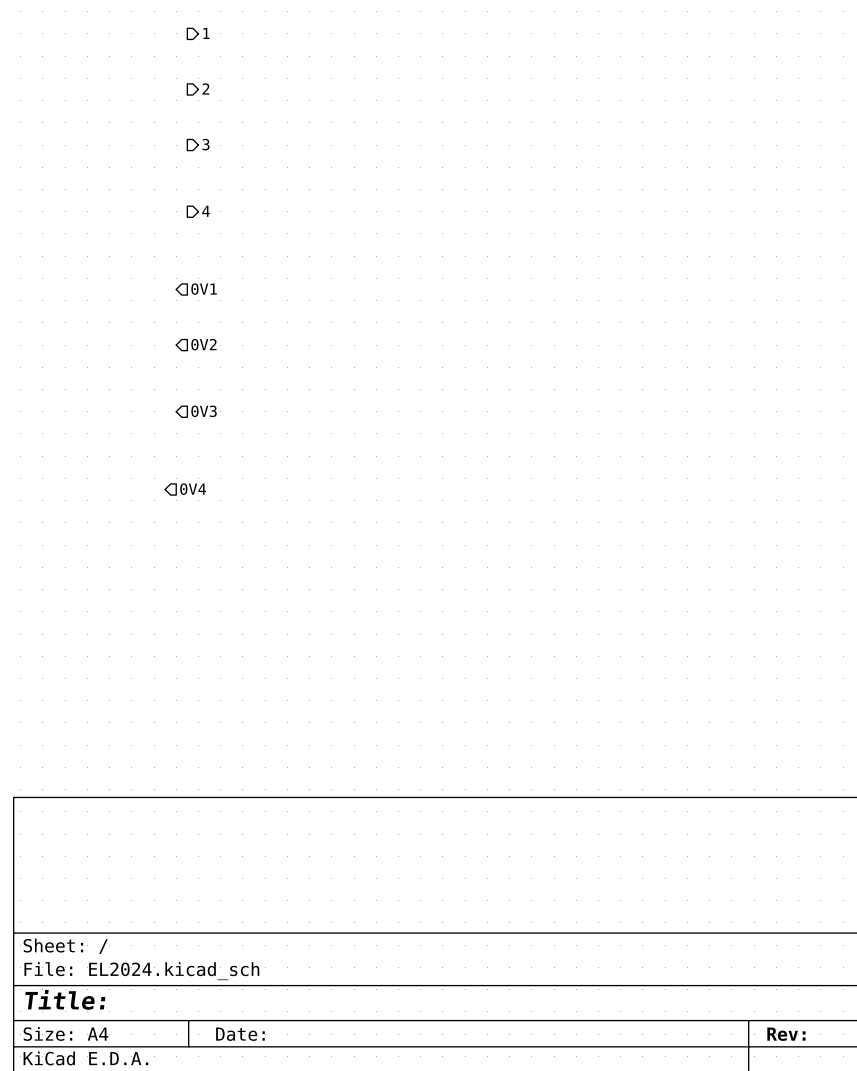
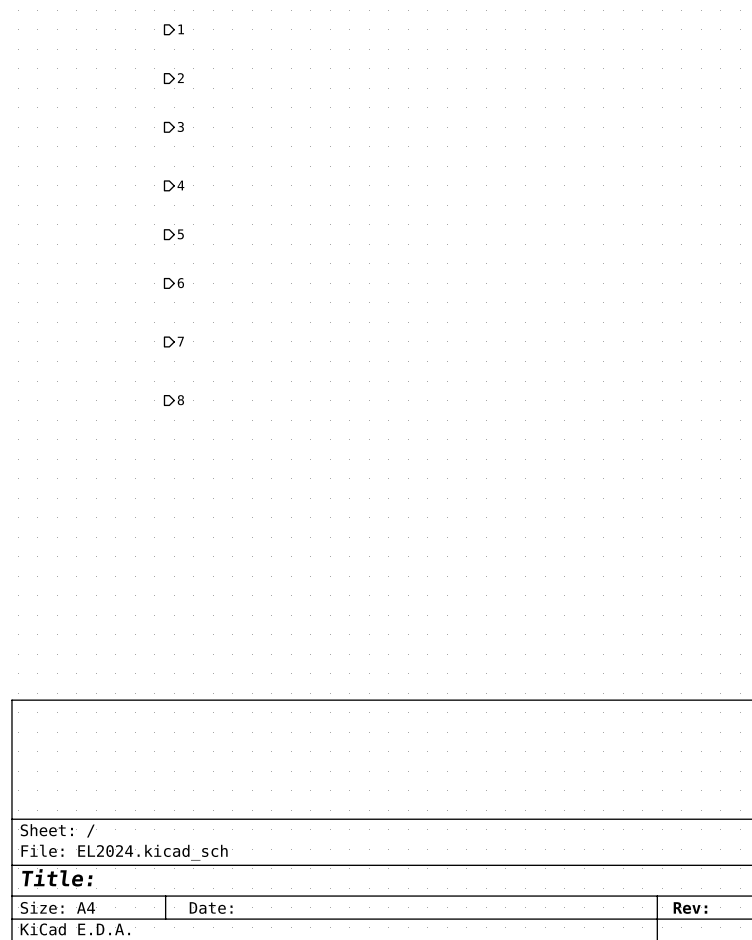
hierarchical label: none -> 5 (180, 234)
hierarchical label: 0V1 (204, 289) -> none
hierarchical label: none -> 6 (180, 283)
hierarchical label: 0V2 (203, 344) -> none
hierarchical label: none -> 7 (180, 341)
hierarchical label: 0V3 (204, 411) -> none
hierarchical label: none -> 8 (180, 400)
hierarchical label: 0V4 (193, 489) -> none

